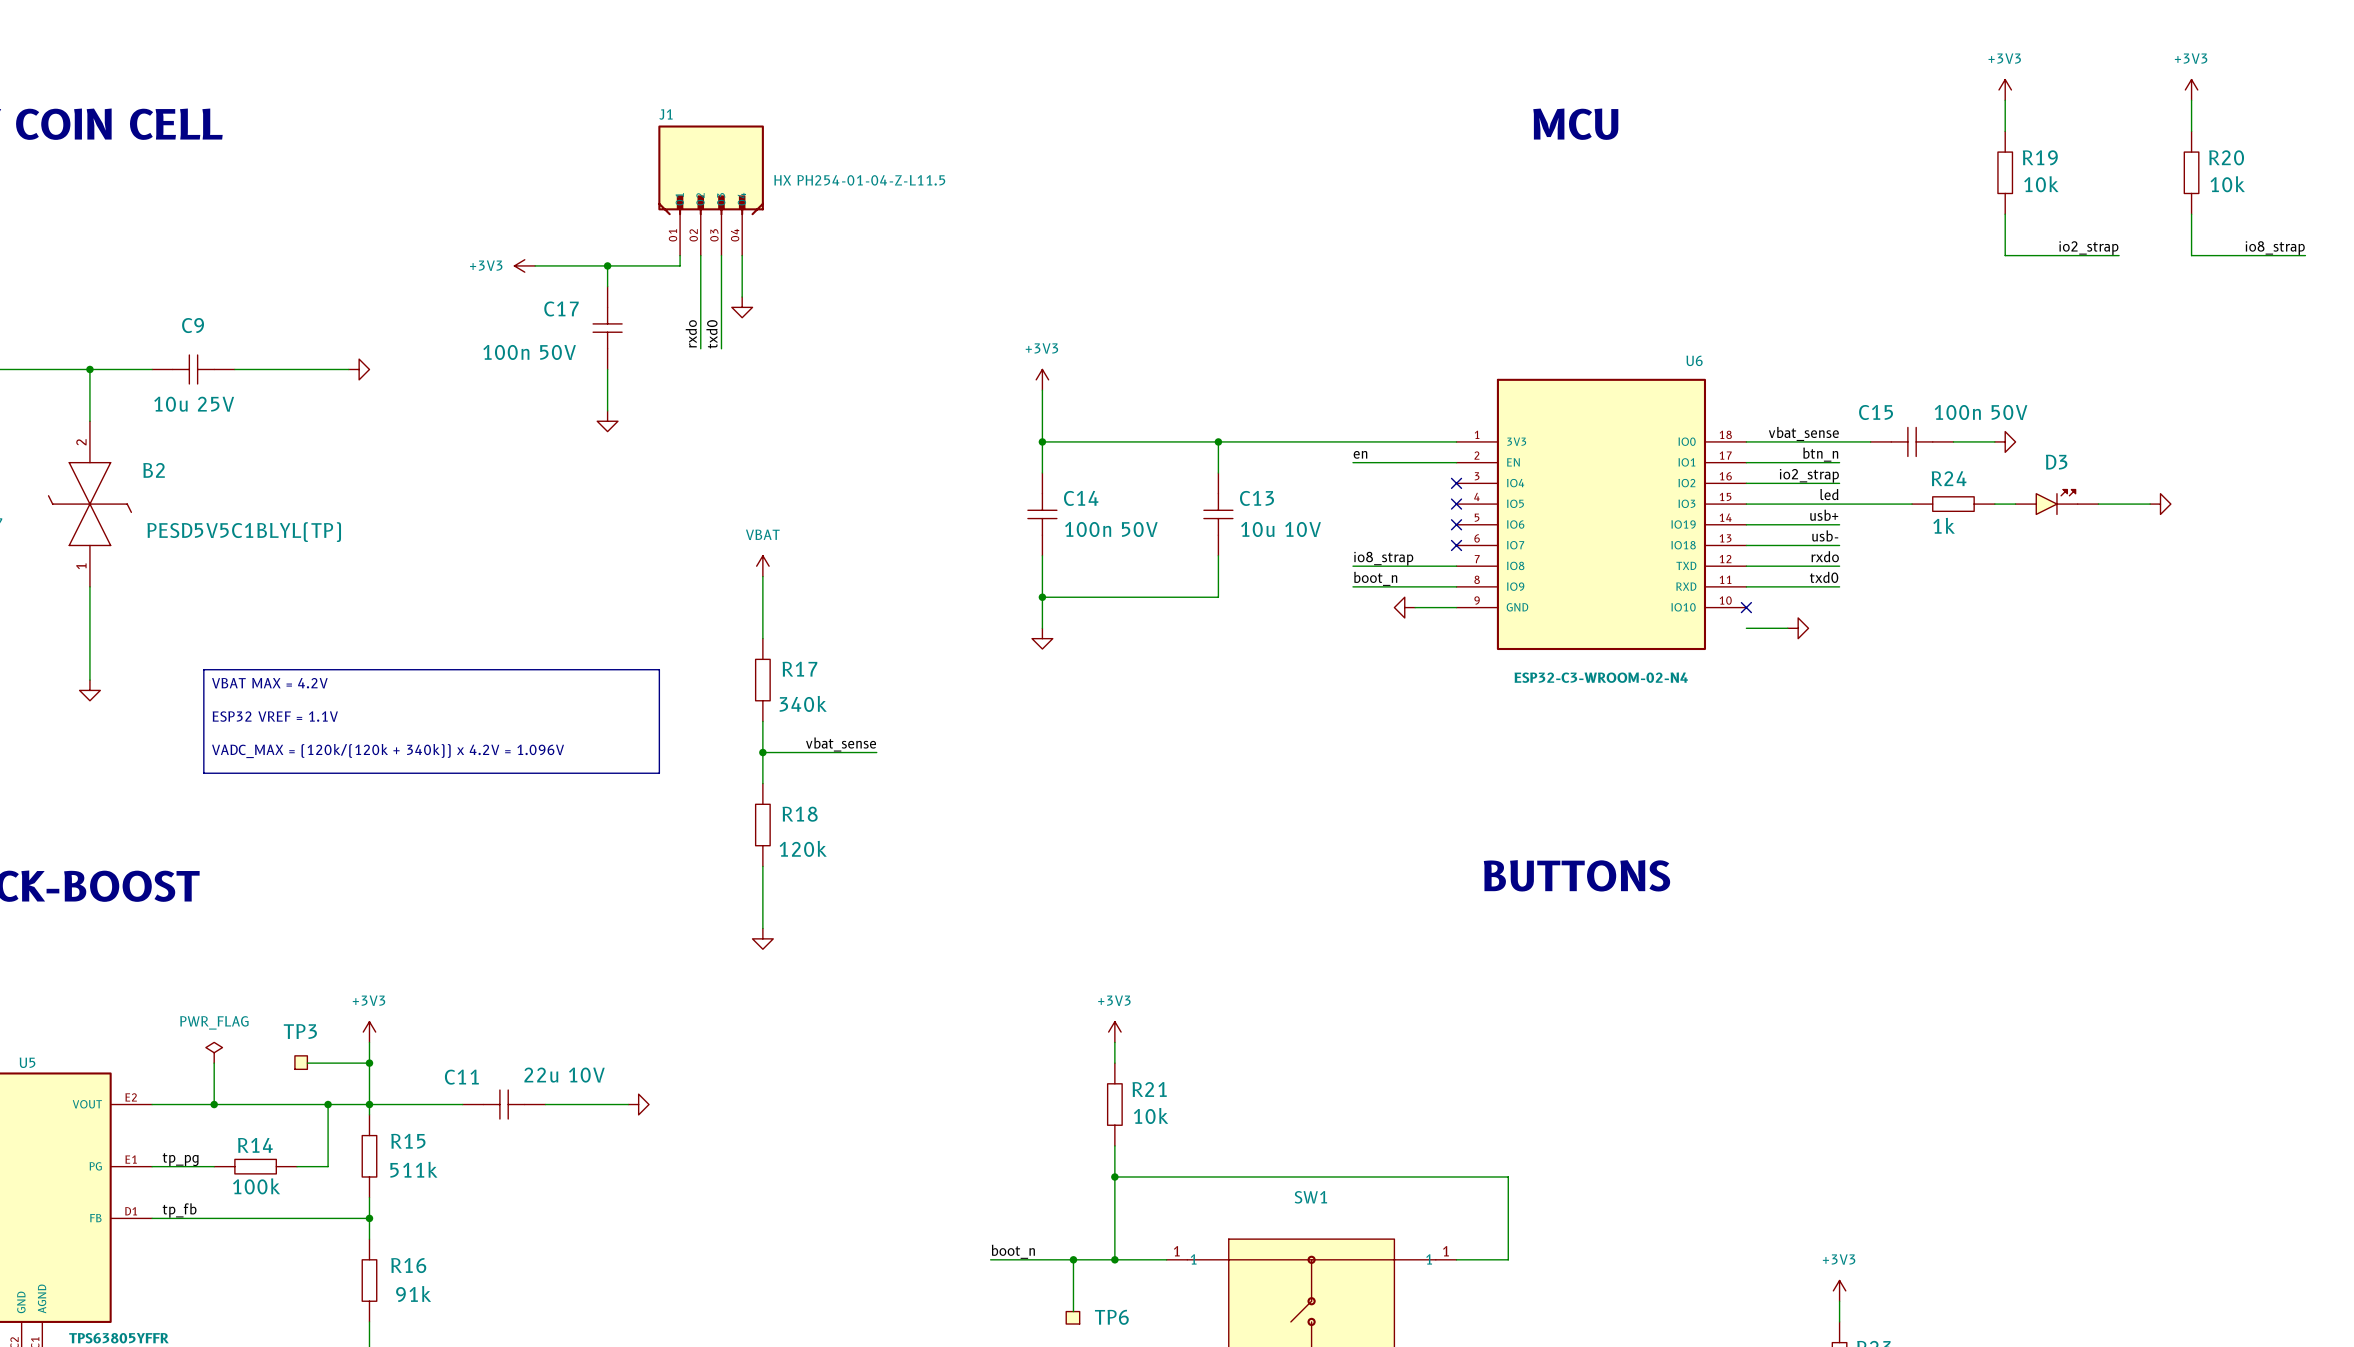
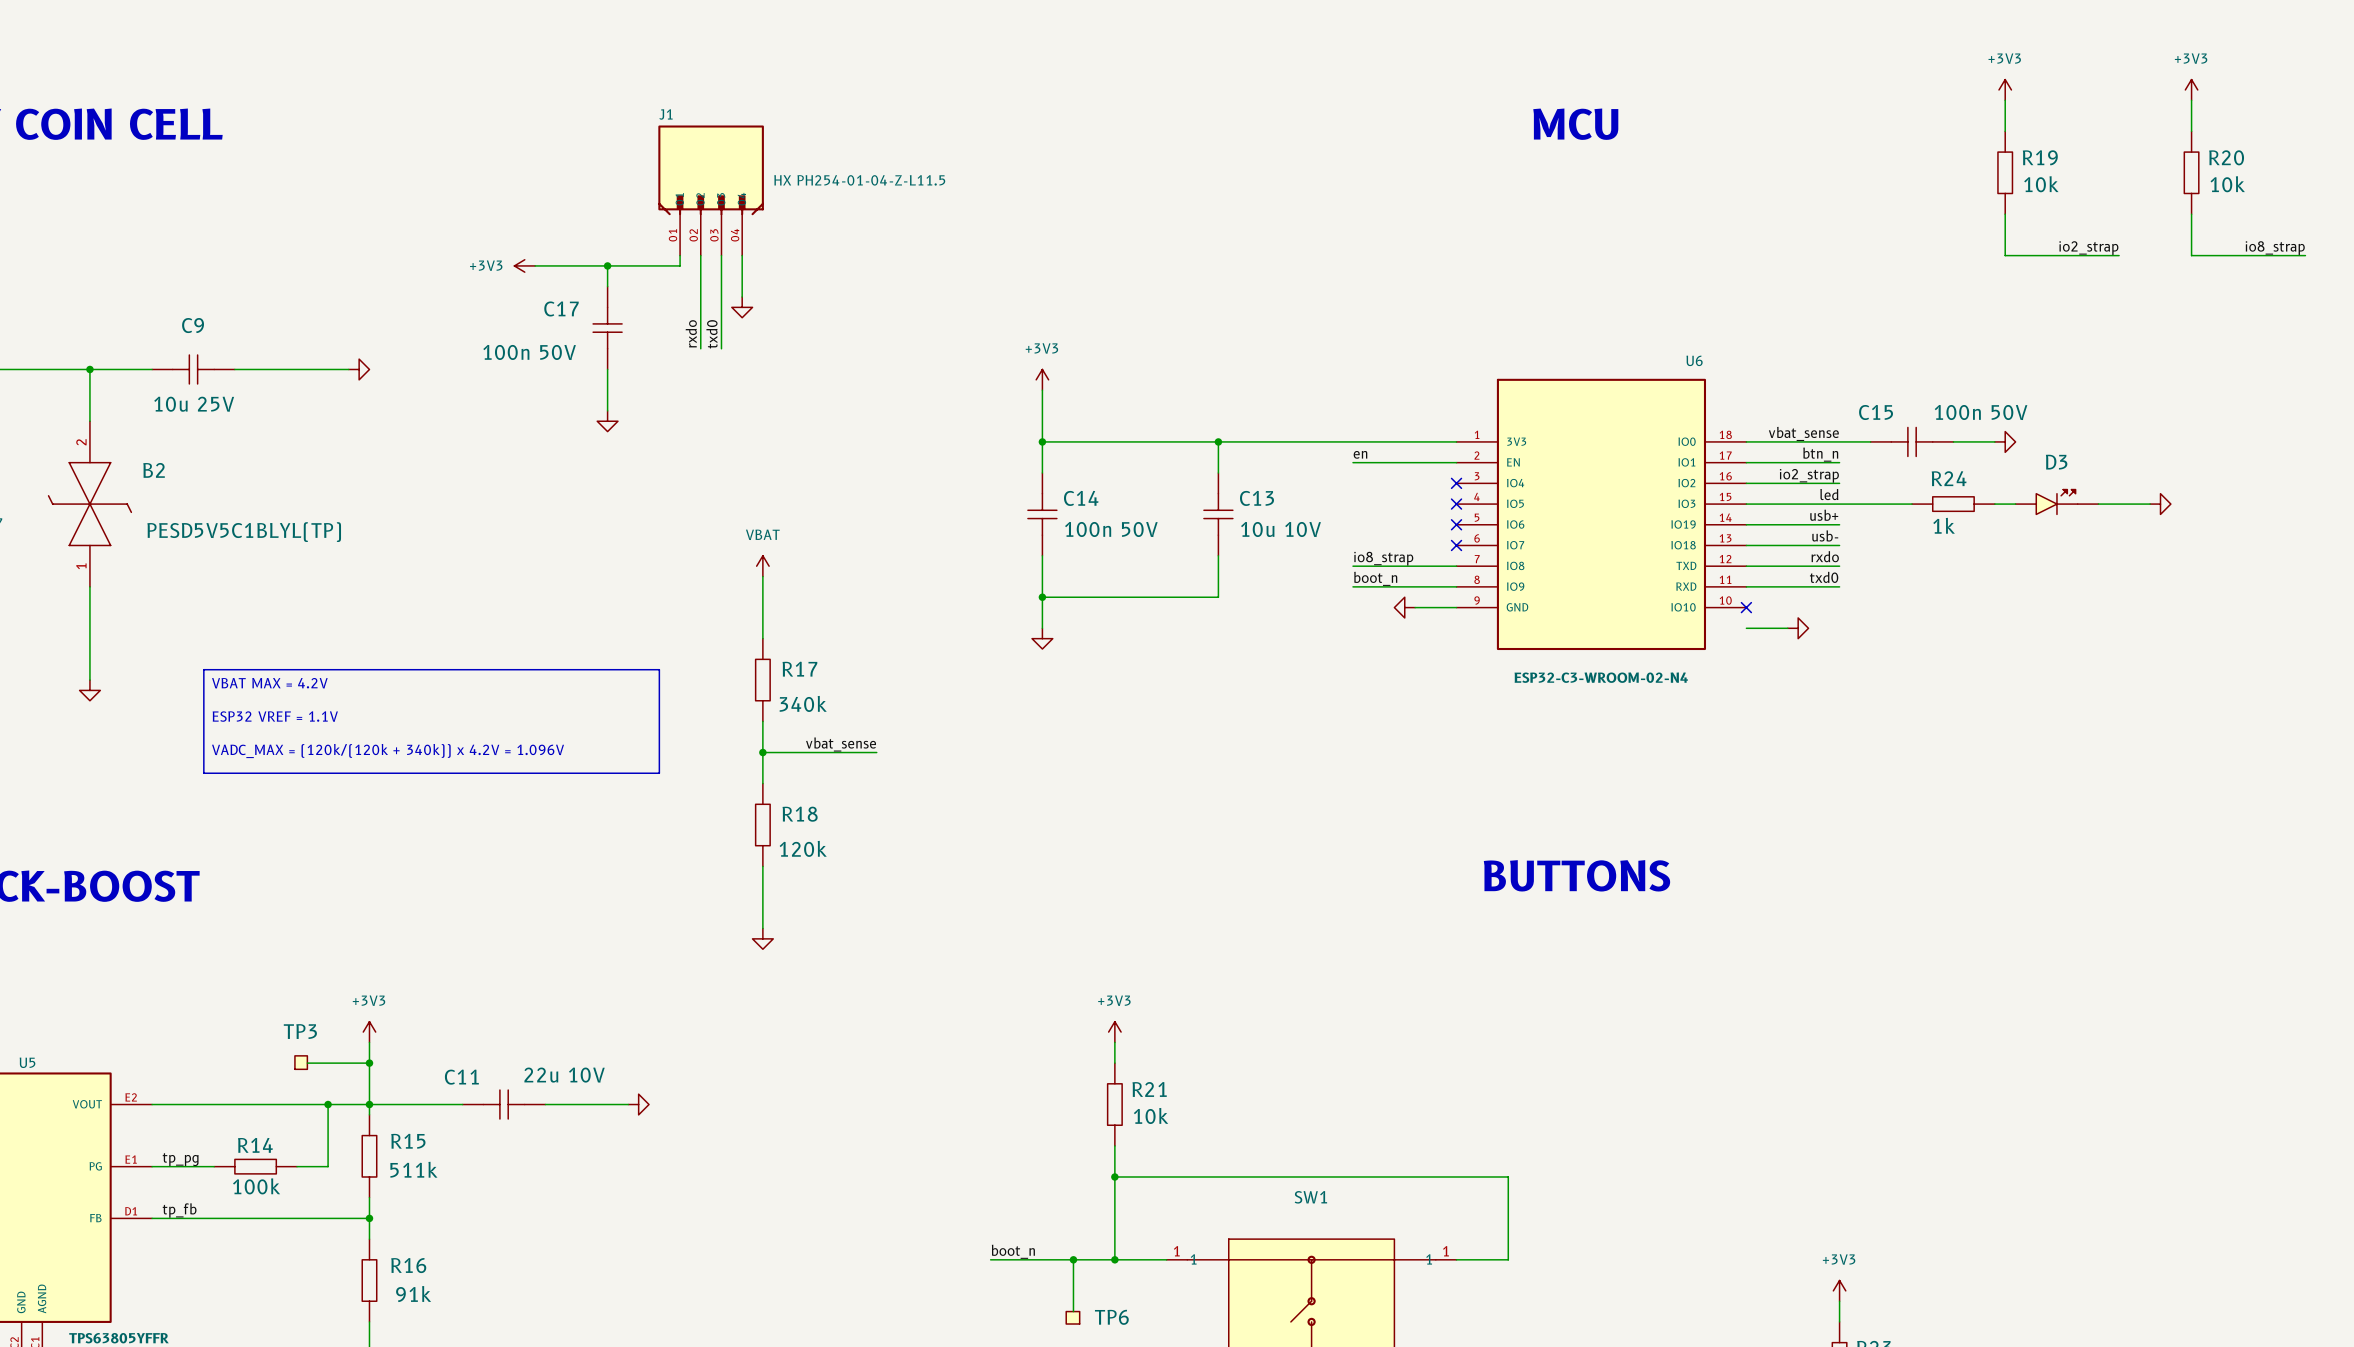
power symbol: PWR_FLAG (214, 1052) -> none
wire: (214, 1063) (214, 1104) -> none
junction: (214, 1104) -> none

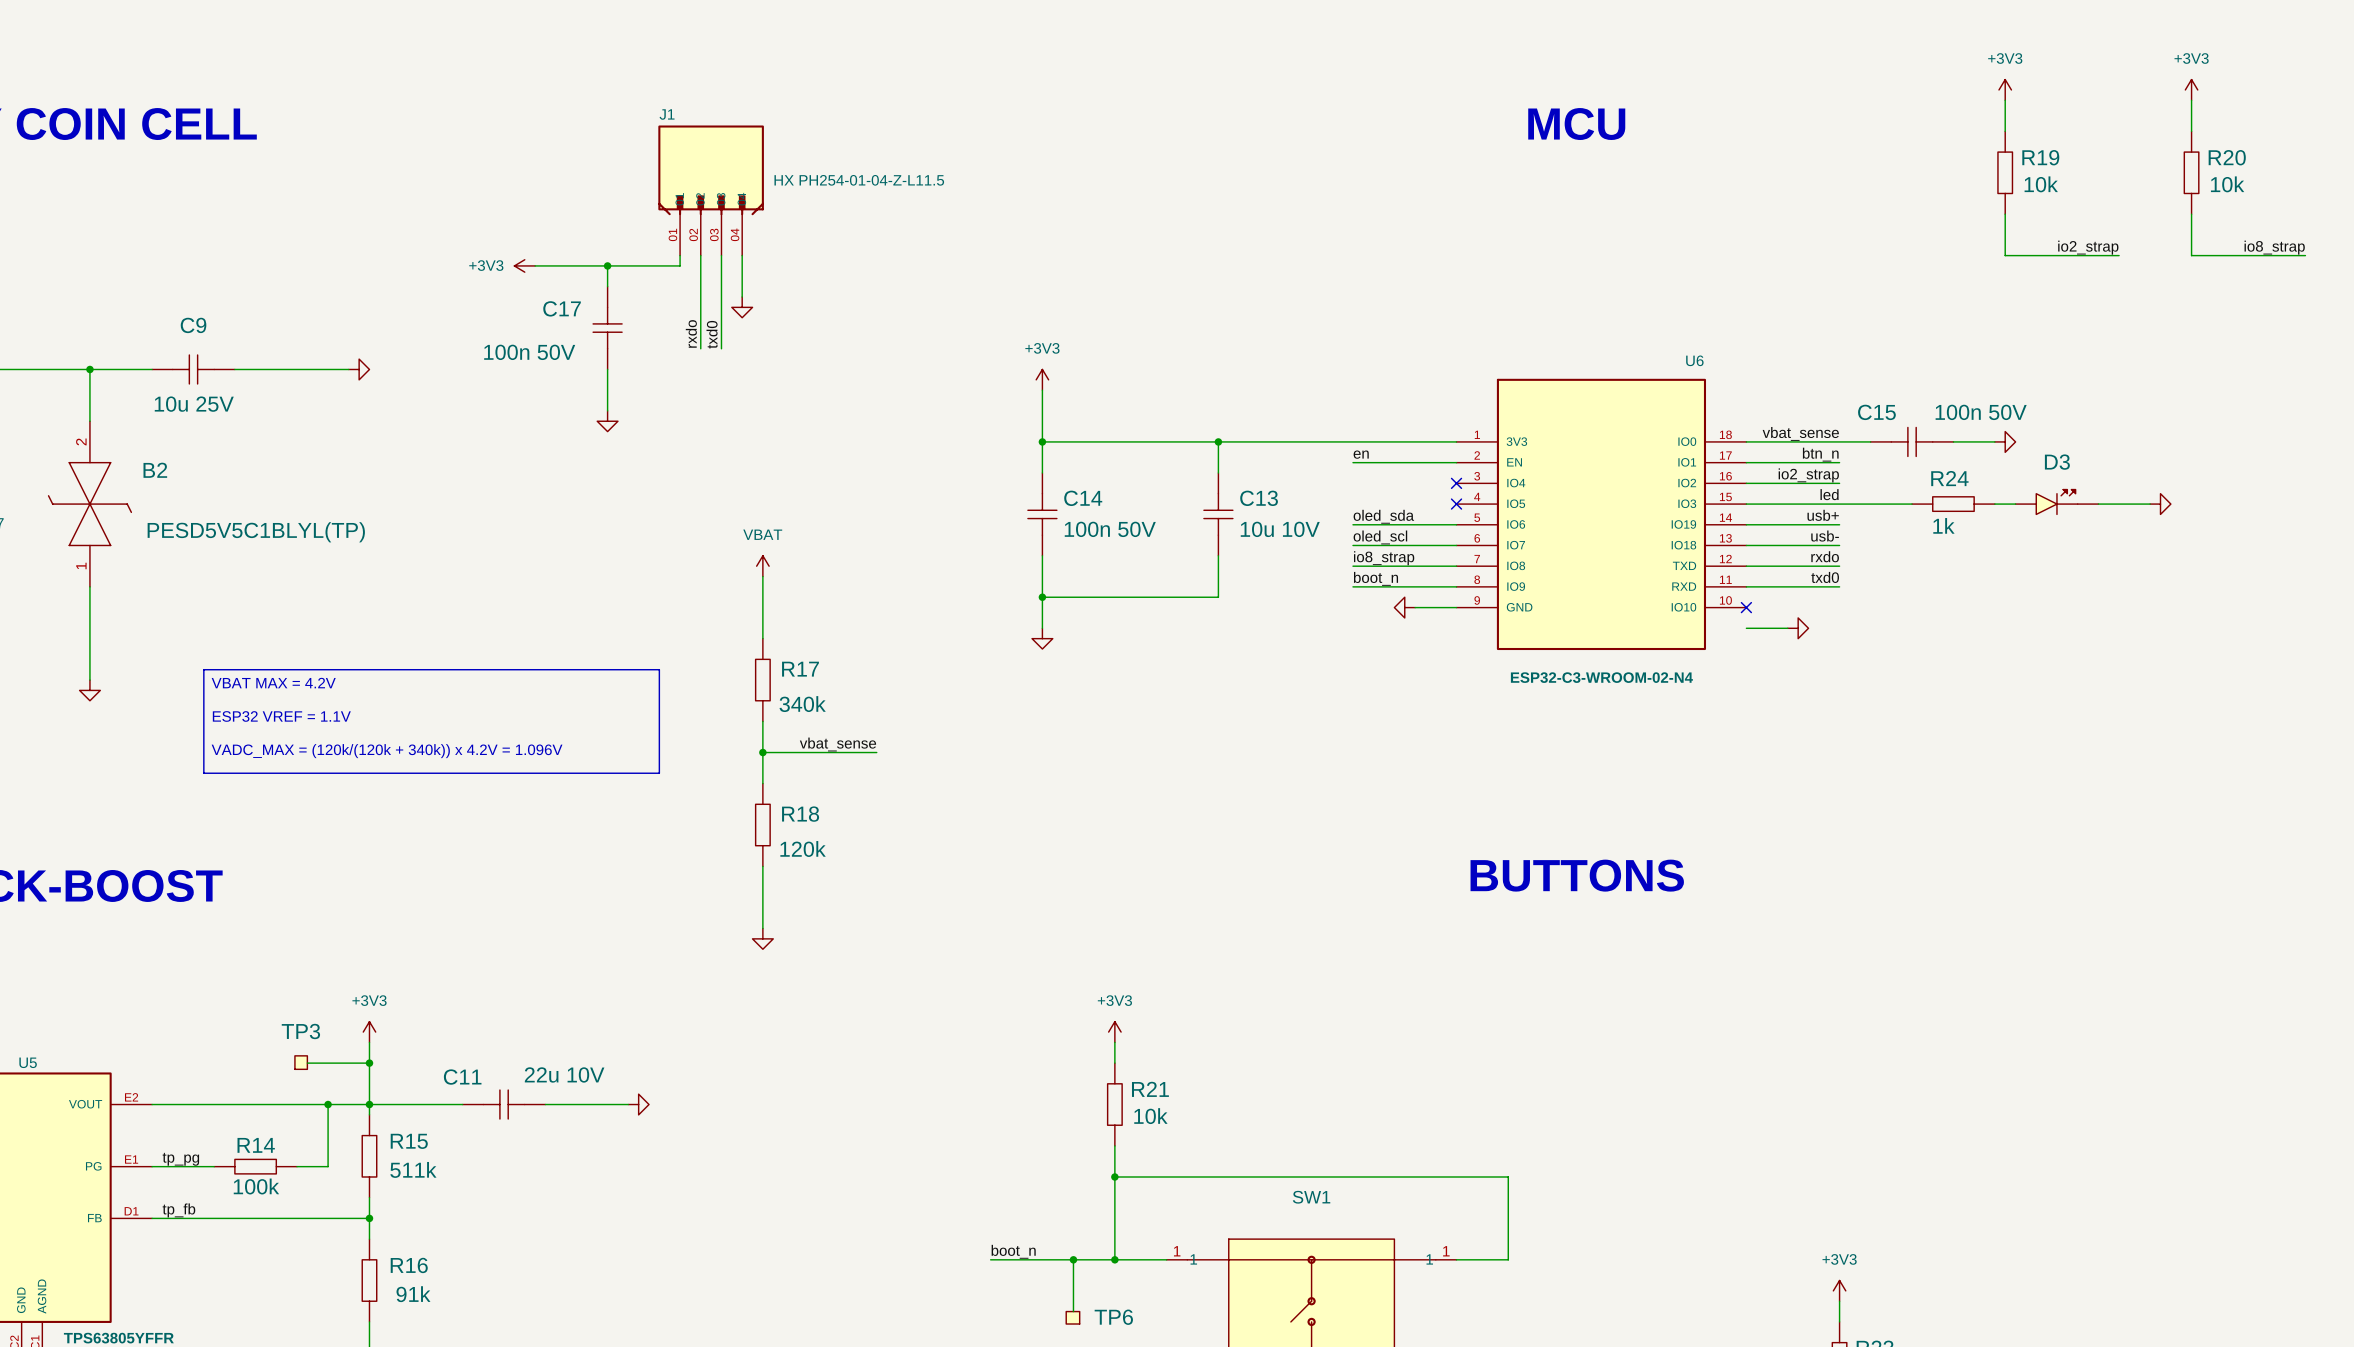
label: none -> oled_sda (1383, 516)
wire: none -> (1352, 524) (1456, 524)
no-connect mark: (1456, 524) -> none
label: none -> oled_scl (1380, 537)
wire: none -> (1352, 545) (1456, 545)
no-connect mark: (1456, 545) -> none

